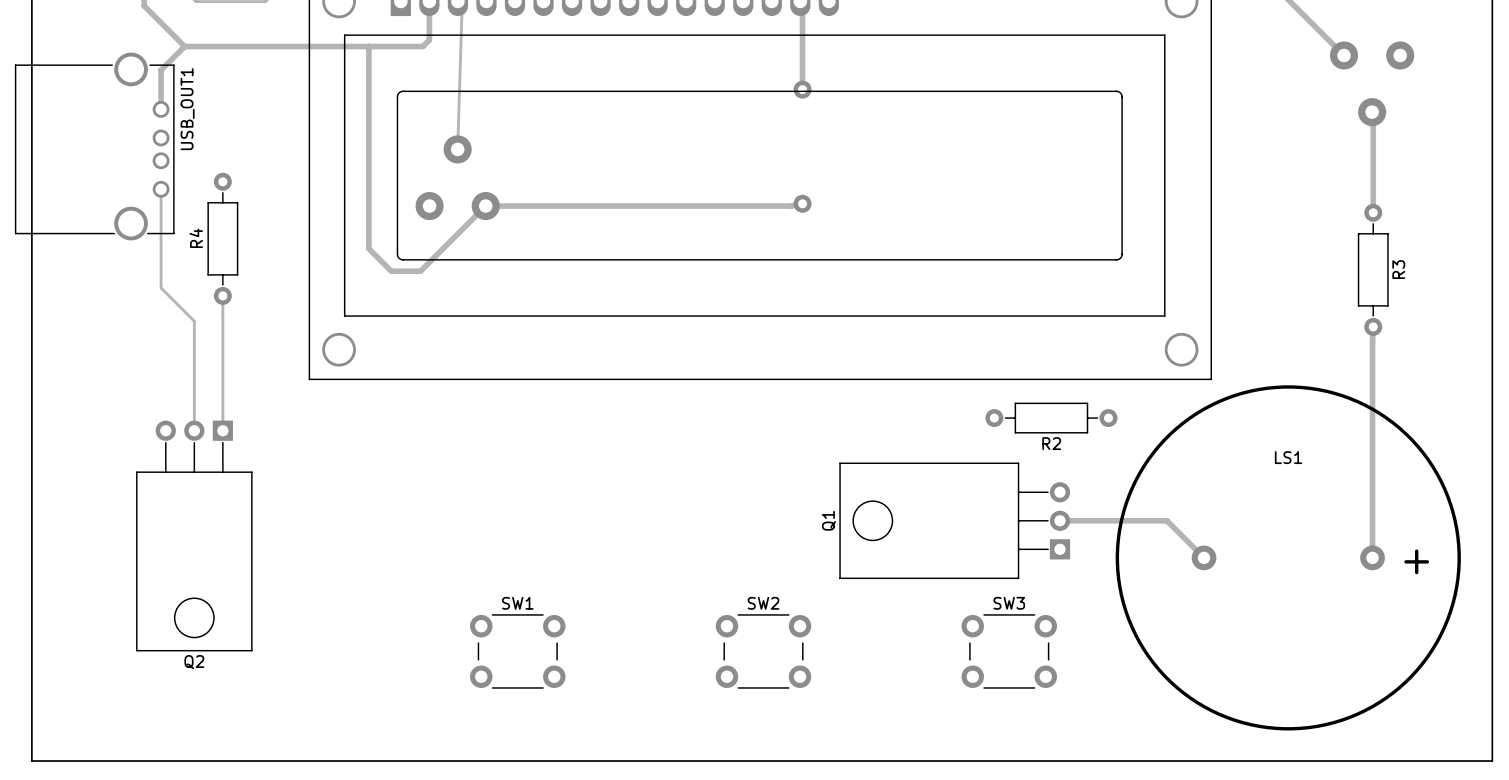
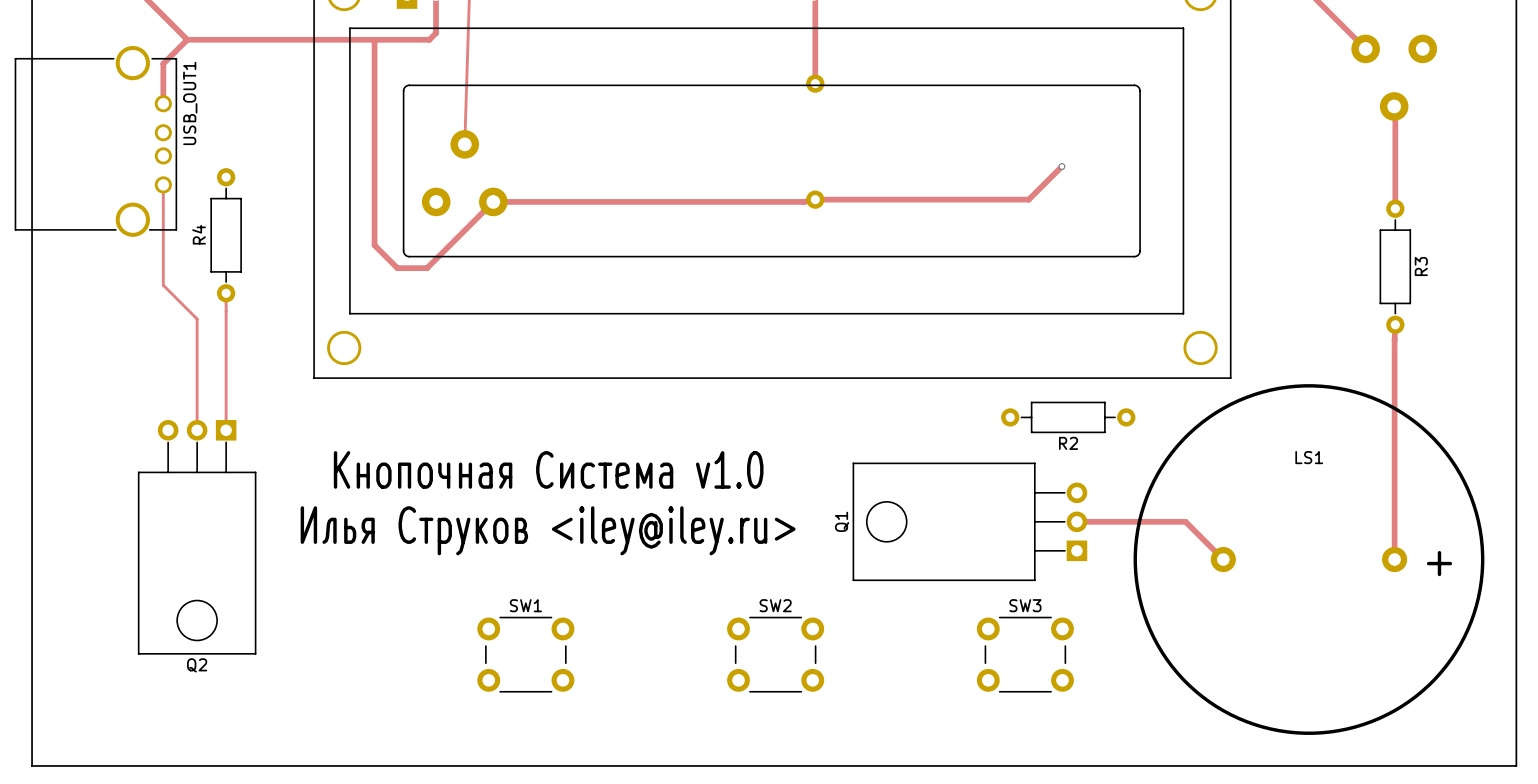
track: none -> (1061, 166) (1028, 199) (815, 199)
via: none -> (1061, 166)
text: none -> Кнопочная Система v1.0 (548, 469)
text: none -> Илья Струков <iley@iley.ru> (548, 530)

